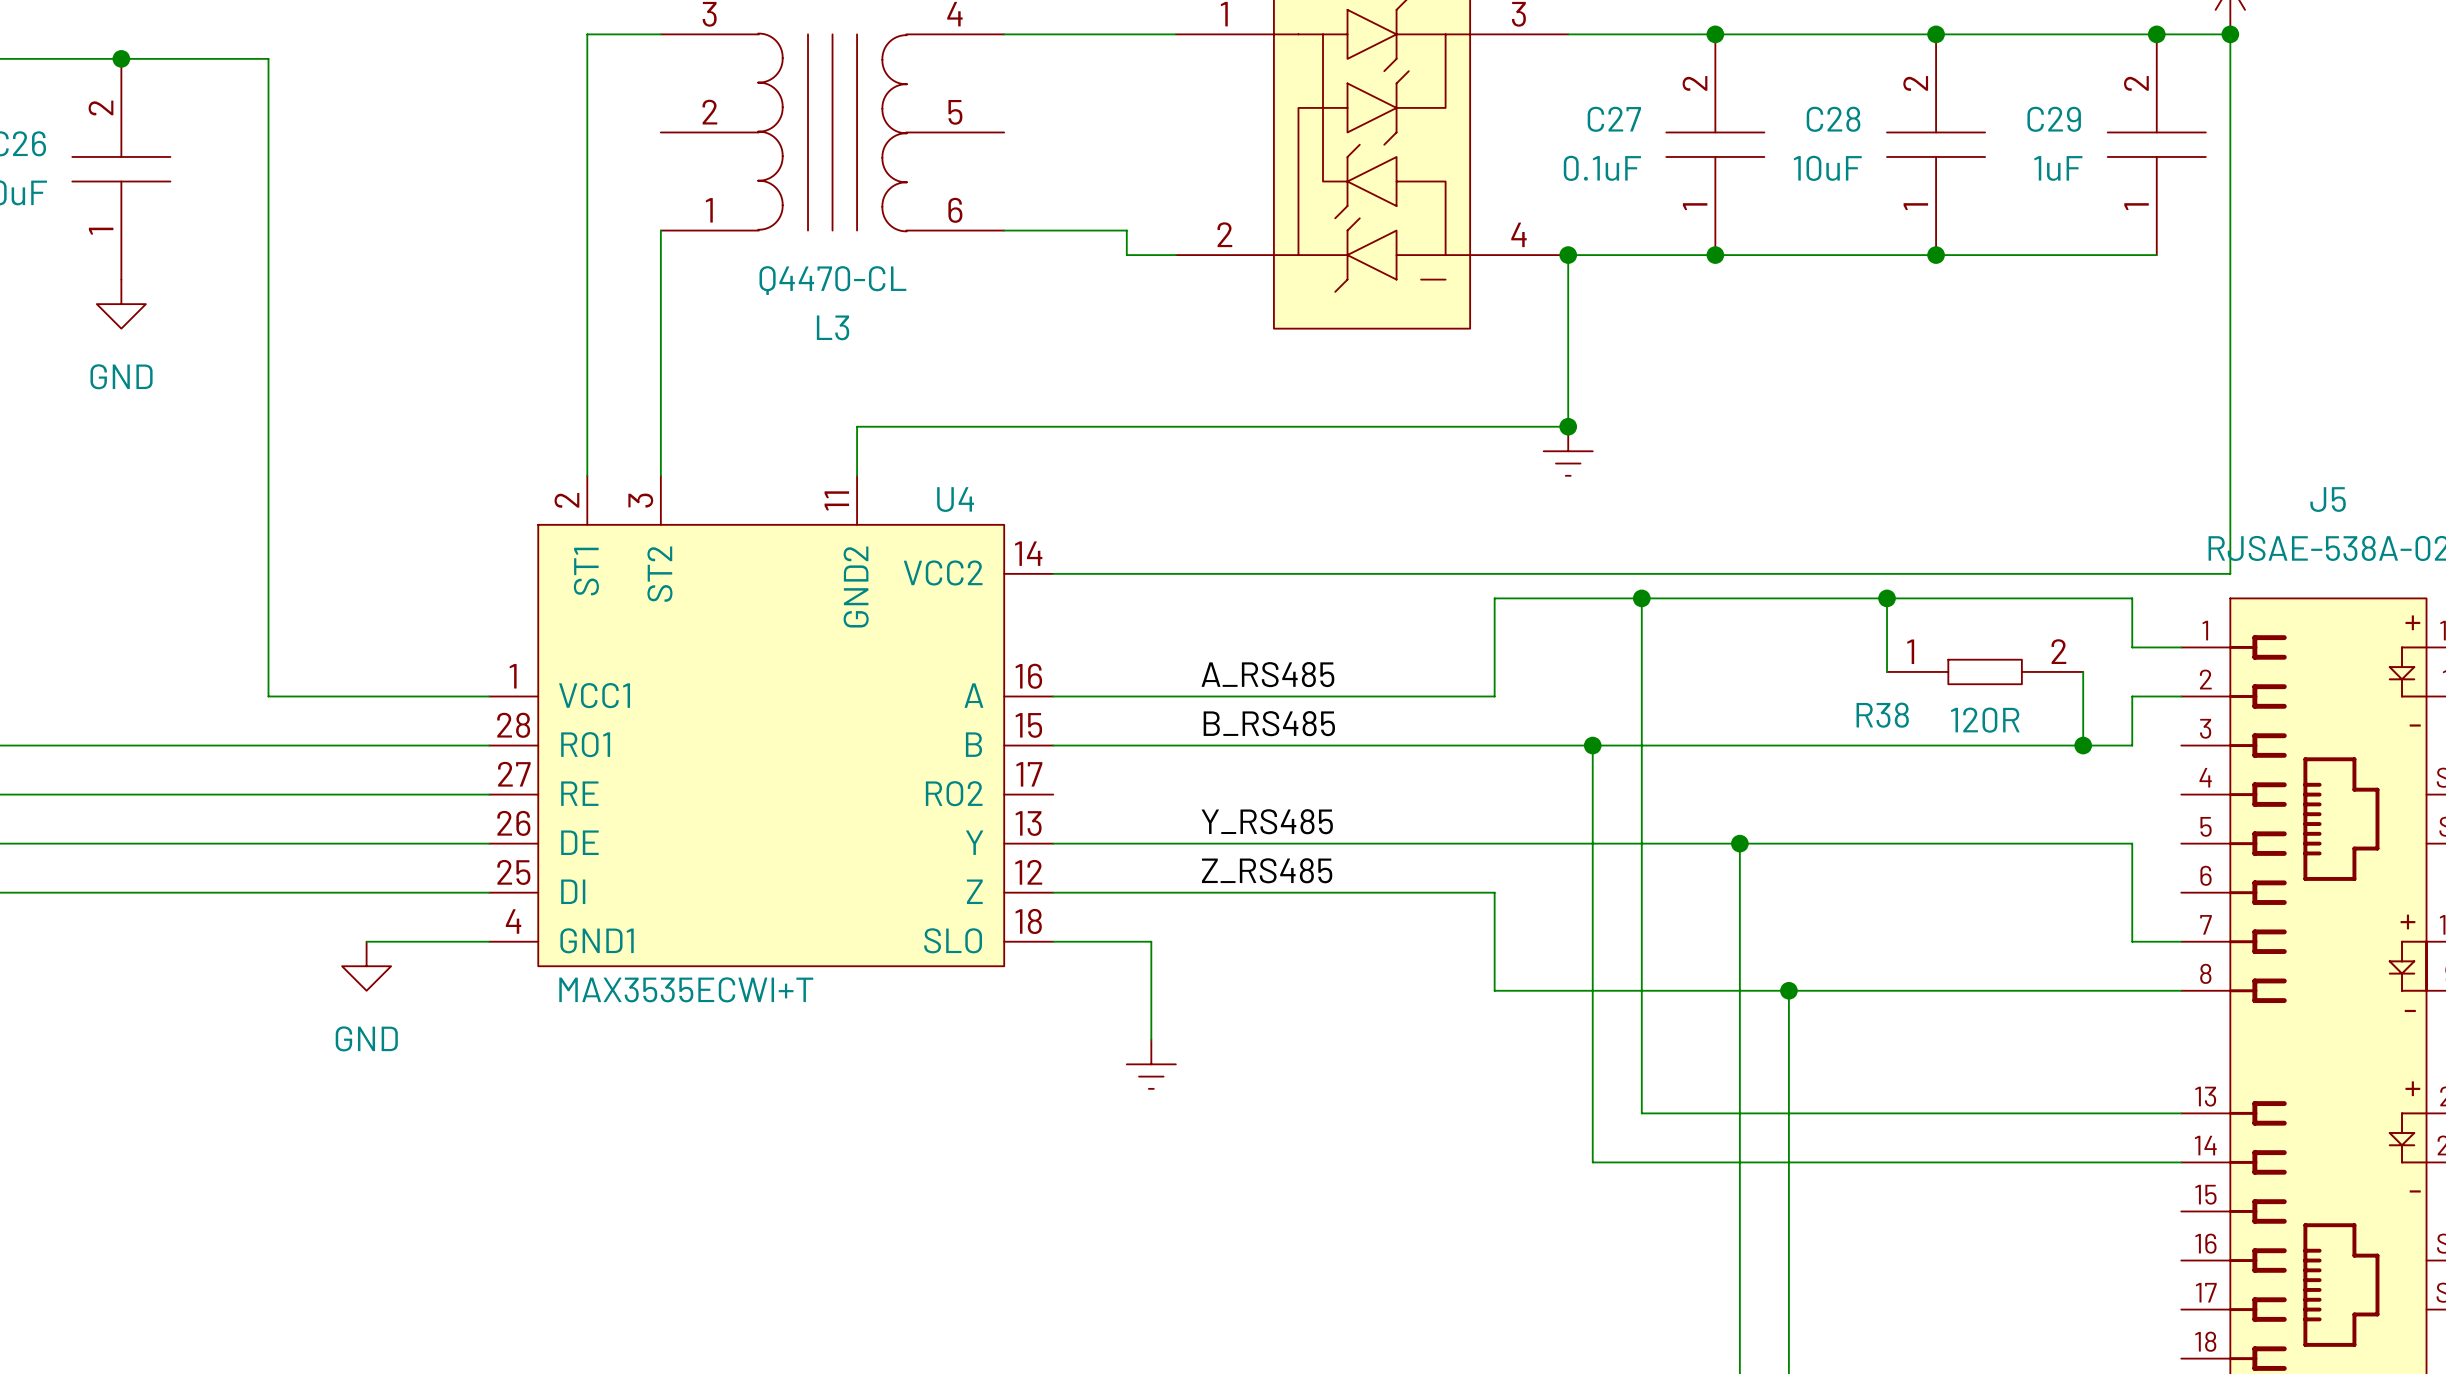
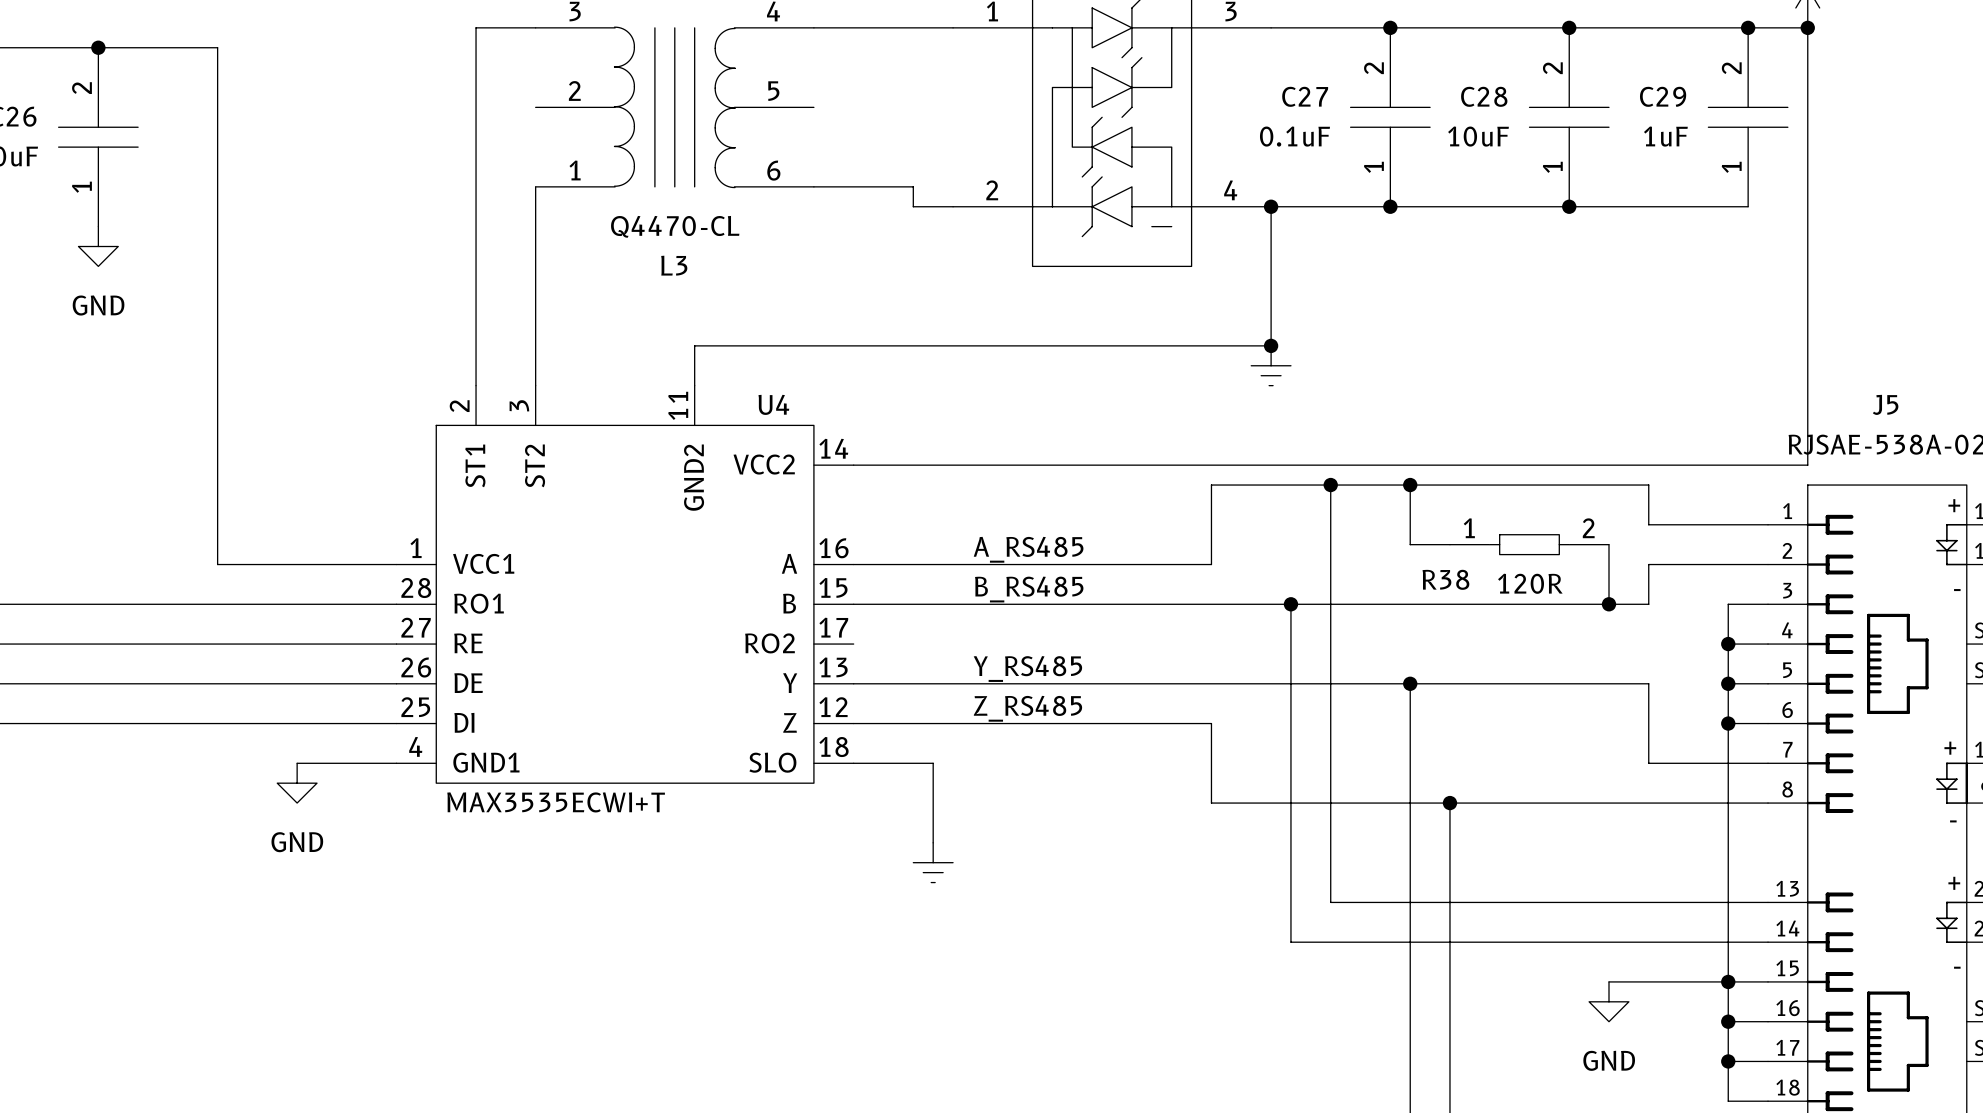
wire: none -> (1410, 485) (1410, 544) (1449, 544)
junction: none -> (1410, 485)
wire: (1887, 598) (1887, 671) -> none
junction: (1887, 598) -> none
wire: (2034, 598) (2132, 598) (2132, 647) -> (1648, 485) (1648, 524) (1728, 524)
R38 position: (1985, 671) -> (1529, 544)
wire: (2083, 671) (2083, 745) -> (1609, 544) (1609, 604)
wire: (2132, 696) (2132, 745) (2034, 745) -> (1728, 564) (1648, 564) (1648, 604)
junction: none -> (1609, 604)
junction: (2083, 745) -> none
wire: none -> (1768, 604) (1728, 604) (1728, 683) (1768, 683)
wire: none -> (1728, 644) (1768, 644)
junction: none -> (1728, 644)
wire: (2034, 843) (2132, 843) -> (1648, 683) (1648, 763) (1728, 763) (1728, 1101) (1768, 1101)
junction: none -> (1728, 683)
wire: none -> (1728, 723) (1768, 723)
junction: none -> (1728, 723)
wire: none -> (1609, 981) (1768, 981)
junction: none -> (1728, 981)
power symbol: none -> GND (1609, 1001)
wire: none -> (1728, 1021) (1768, 1021)
junction: none -> (1728, 1021)
wire: none -> (1728, 1061) (1768, 1061)
junction: none -> (1728, 1061)

